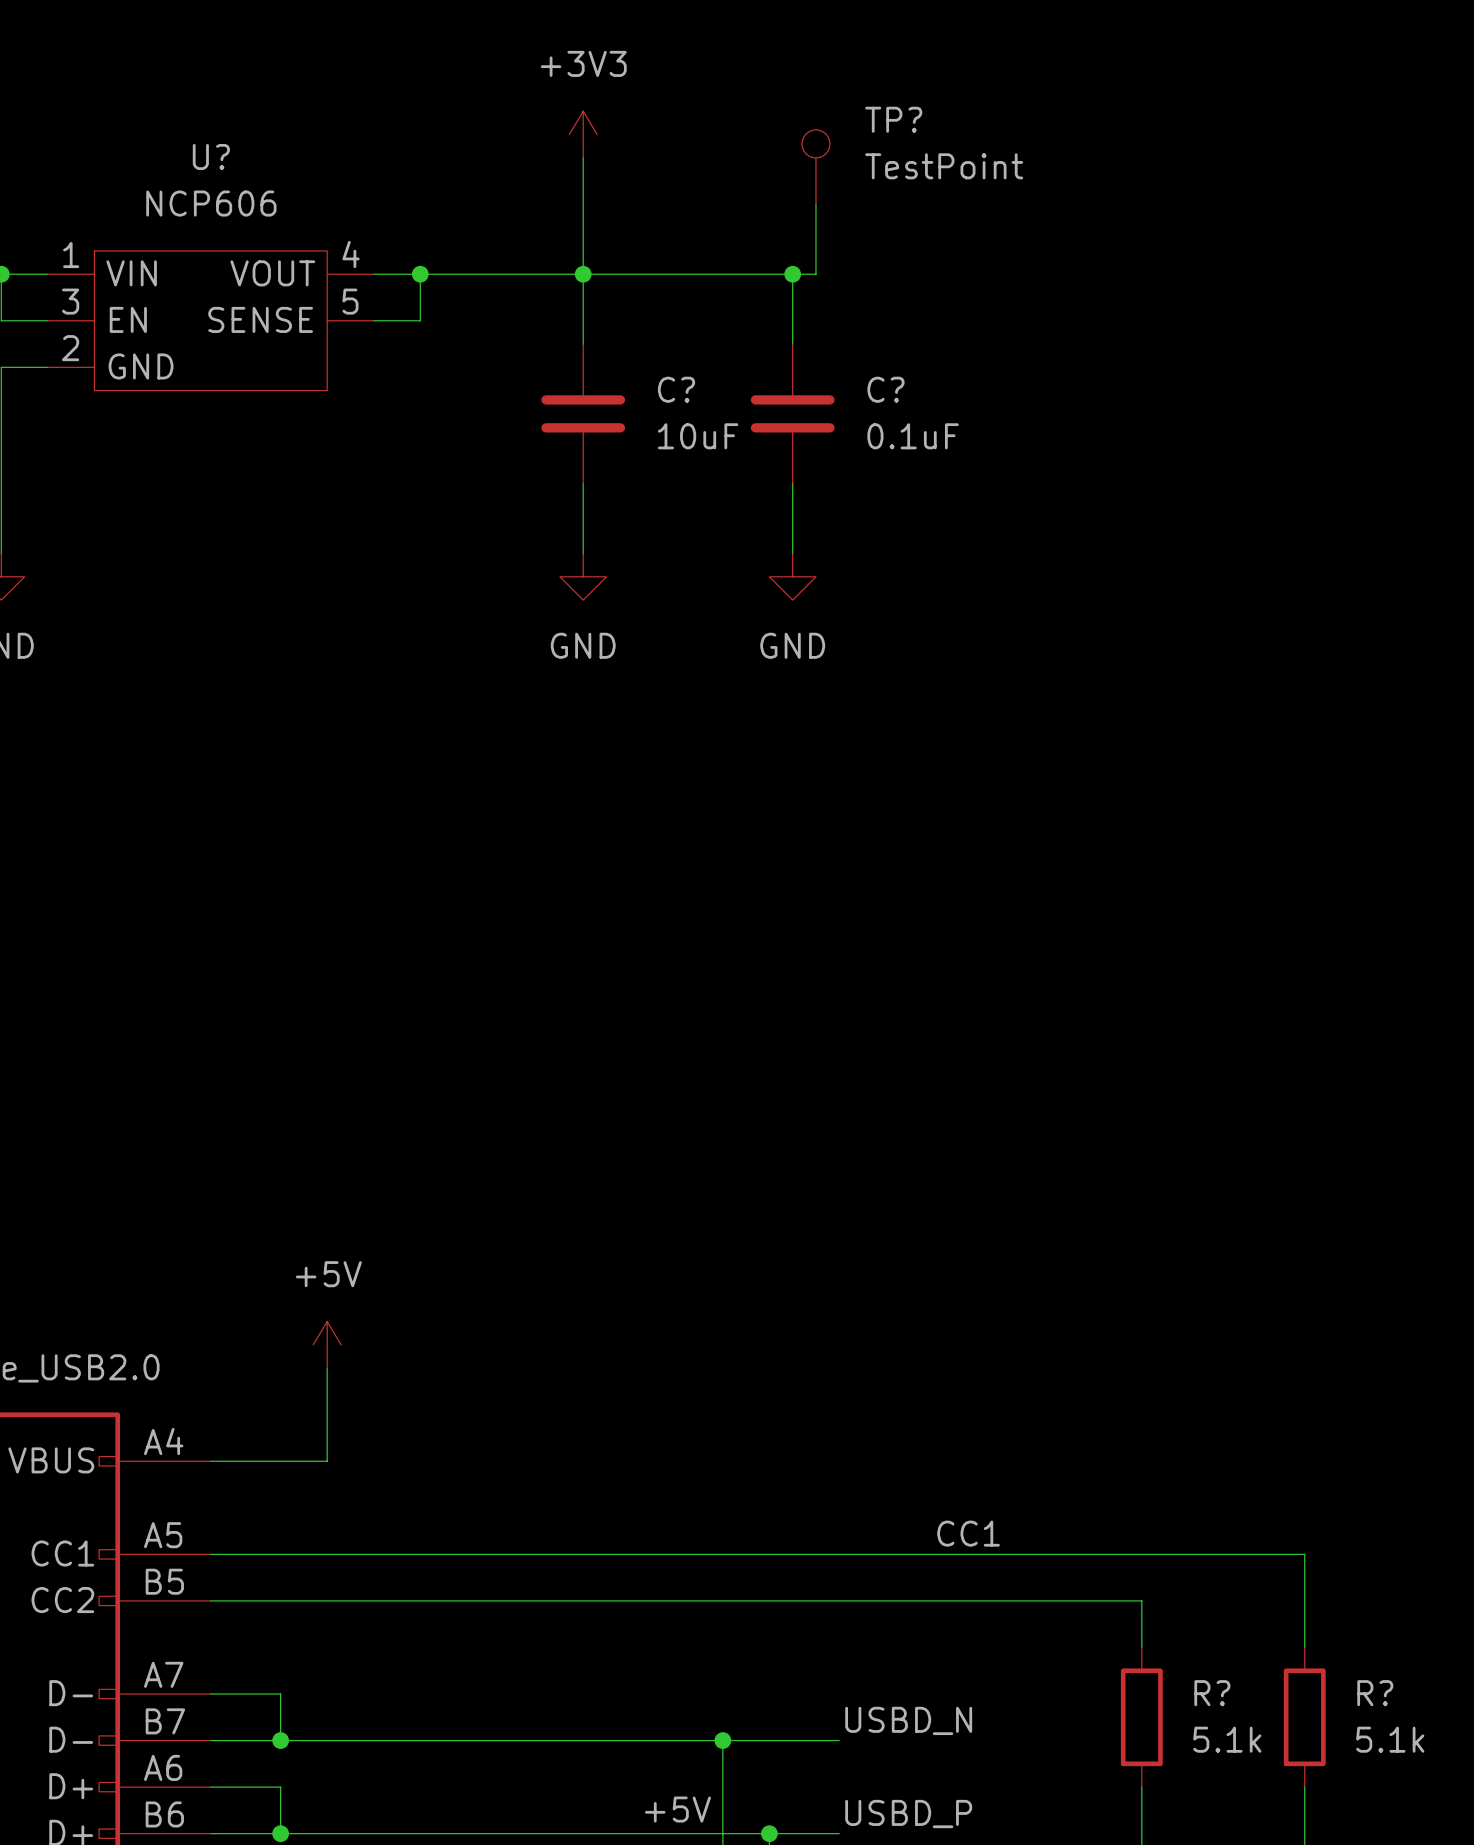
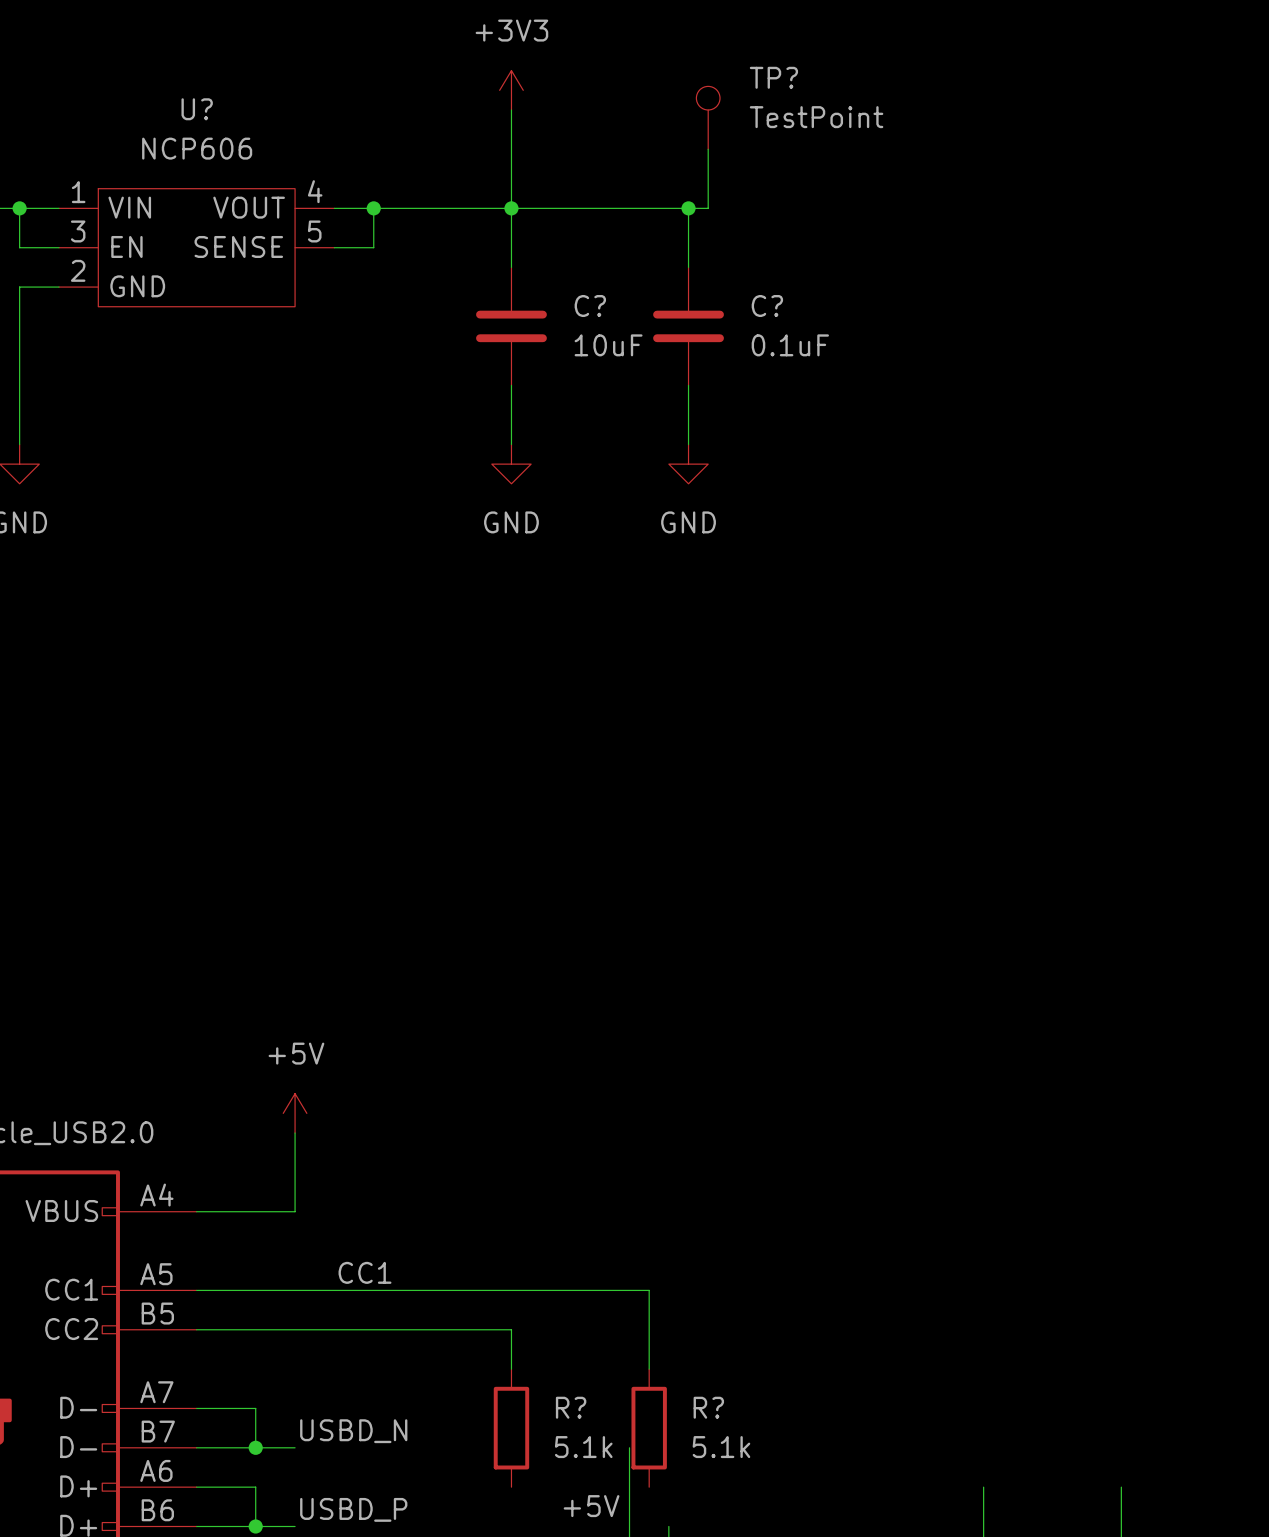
label: none -> CC1 (365, 1272)
label: CC1 (968, 1533) -> none
wire: (746, 1554) (1304, 1554) (1304, 1647) -> (649, 1290) (649, 1369)
wire: (583, 1600) (1141, 1600) (1141, 1647) -> (511, 1329) (511, 1369)
R?: none -> 5.1k (511, 1428)
R?: none -> 5.1k (649, 1428)
R?: 5.1k (1141, 1717) -> none
R?: 5.1k (1304, 1717) -> none
label: none -> USBD_N (353, 1431)
label: USBD_N (908, 1720) -> none
wire: (327, 1740) (839, 1740) -> none
junction: (722, 1740) -> none
label: none -> USBD_P (353, 1509)
label: USBD_P (908, 1814) -> none
wire: (327, 1833) (839, 1833) -> none
junction: (769, 1833) -> none

